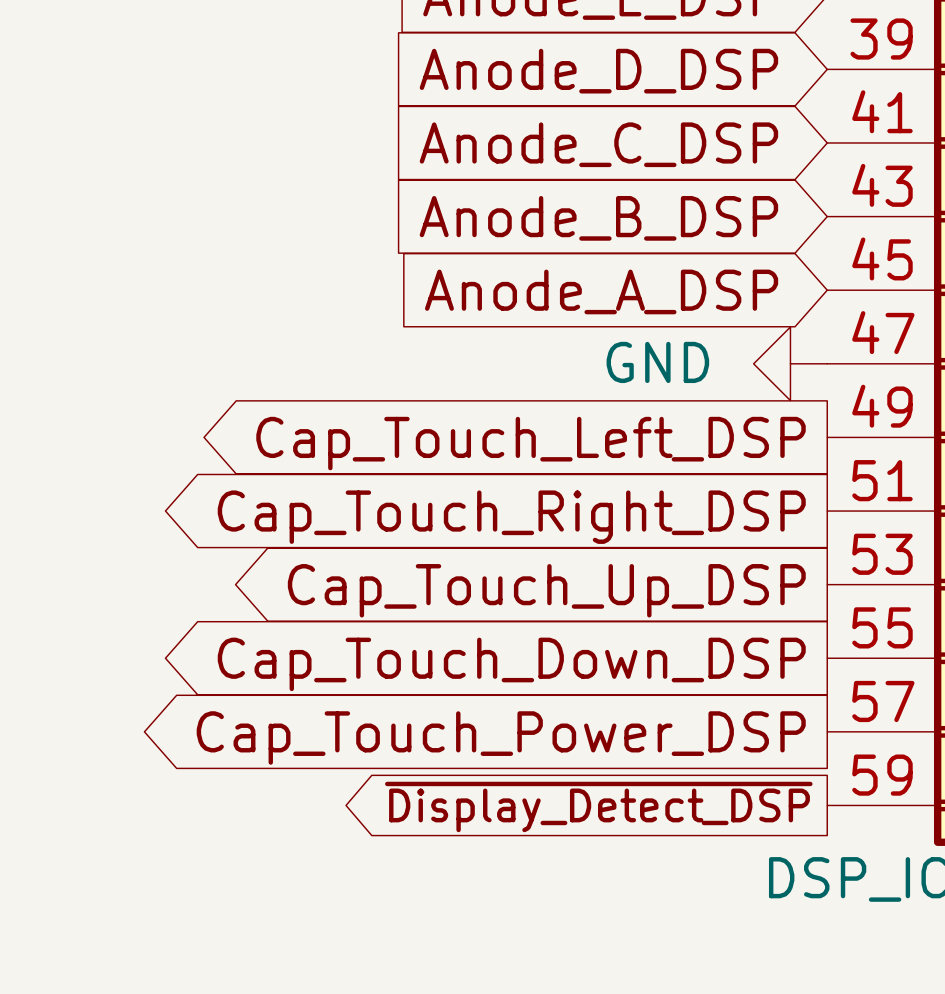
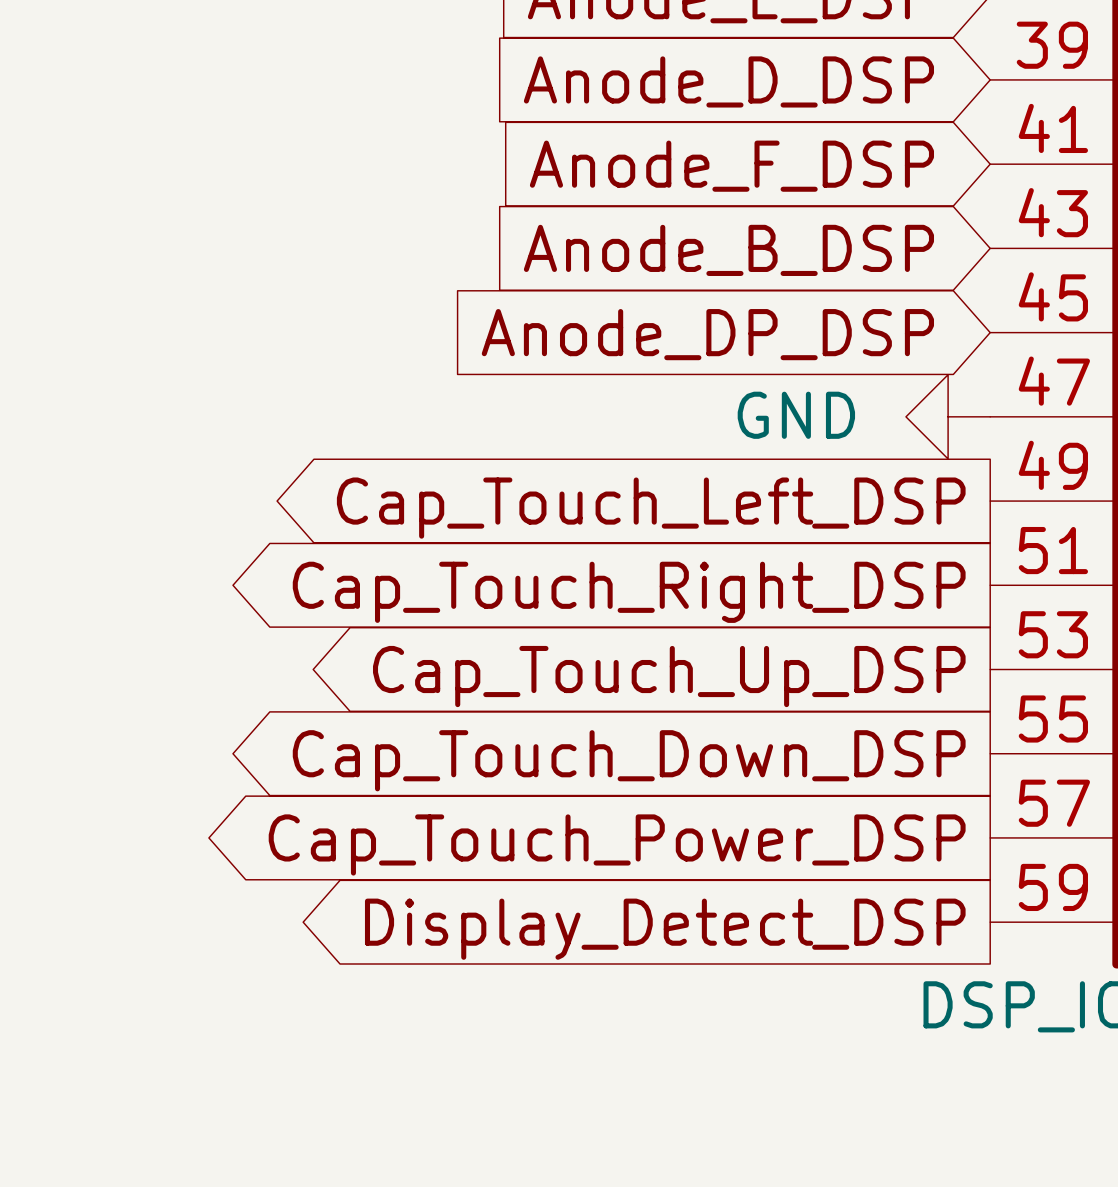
global label: Anode_C_DSP (598, 144) -> Anode_F_DSP (731, 166)
global label: Anode_A_DSP (601, 291) -> Anode_DP_DSP (707, 334)
global label: ~{Display_Detect_DSP} (598, 806) -> Display_Detect_DSP (665, 929)

